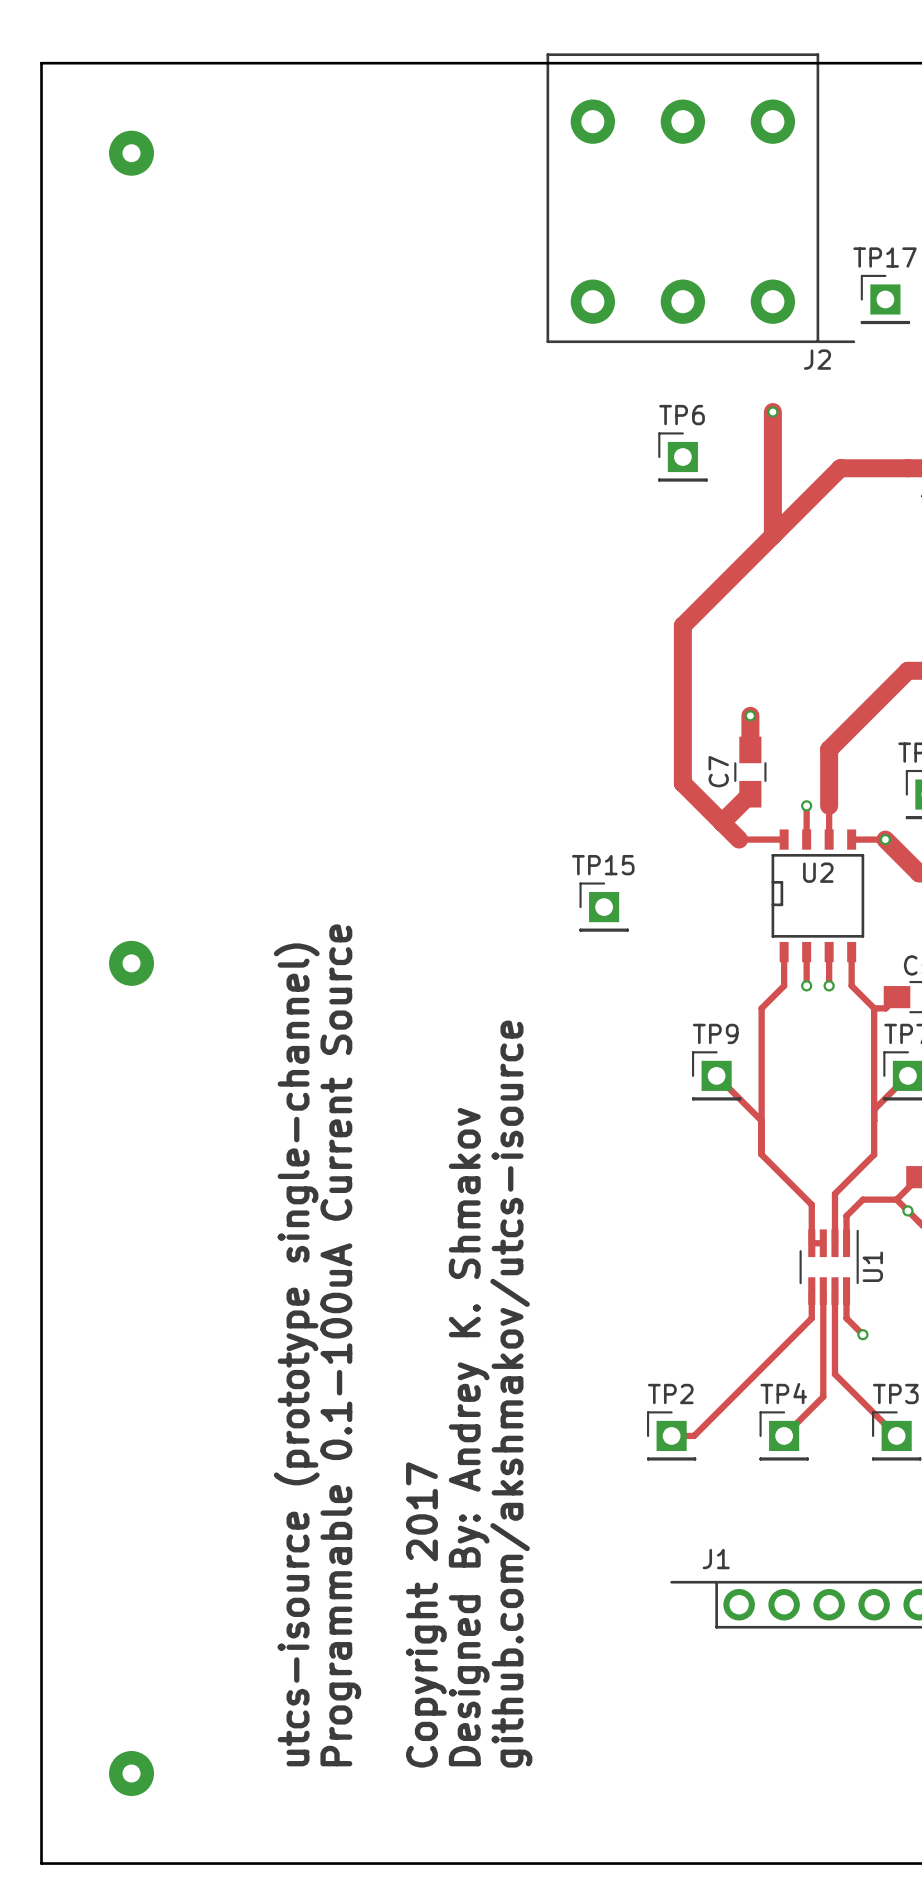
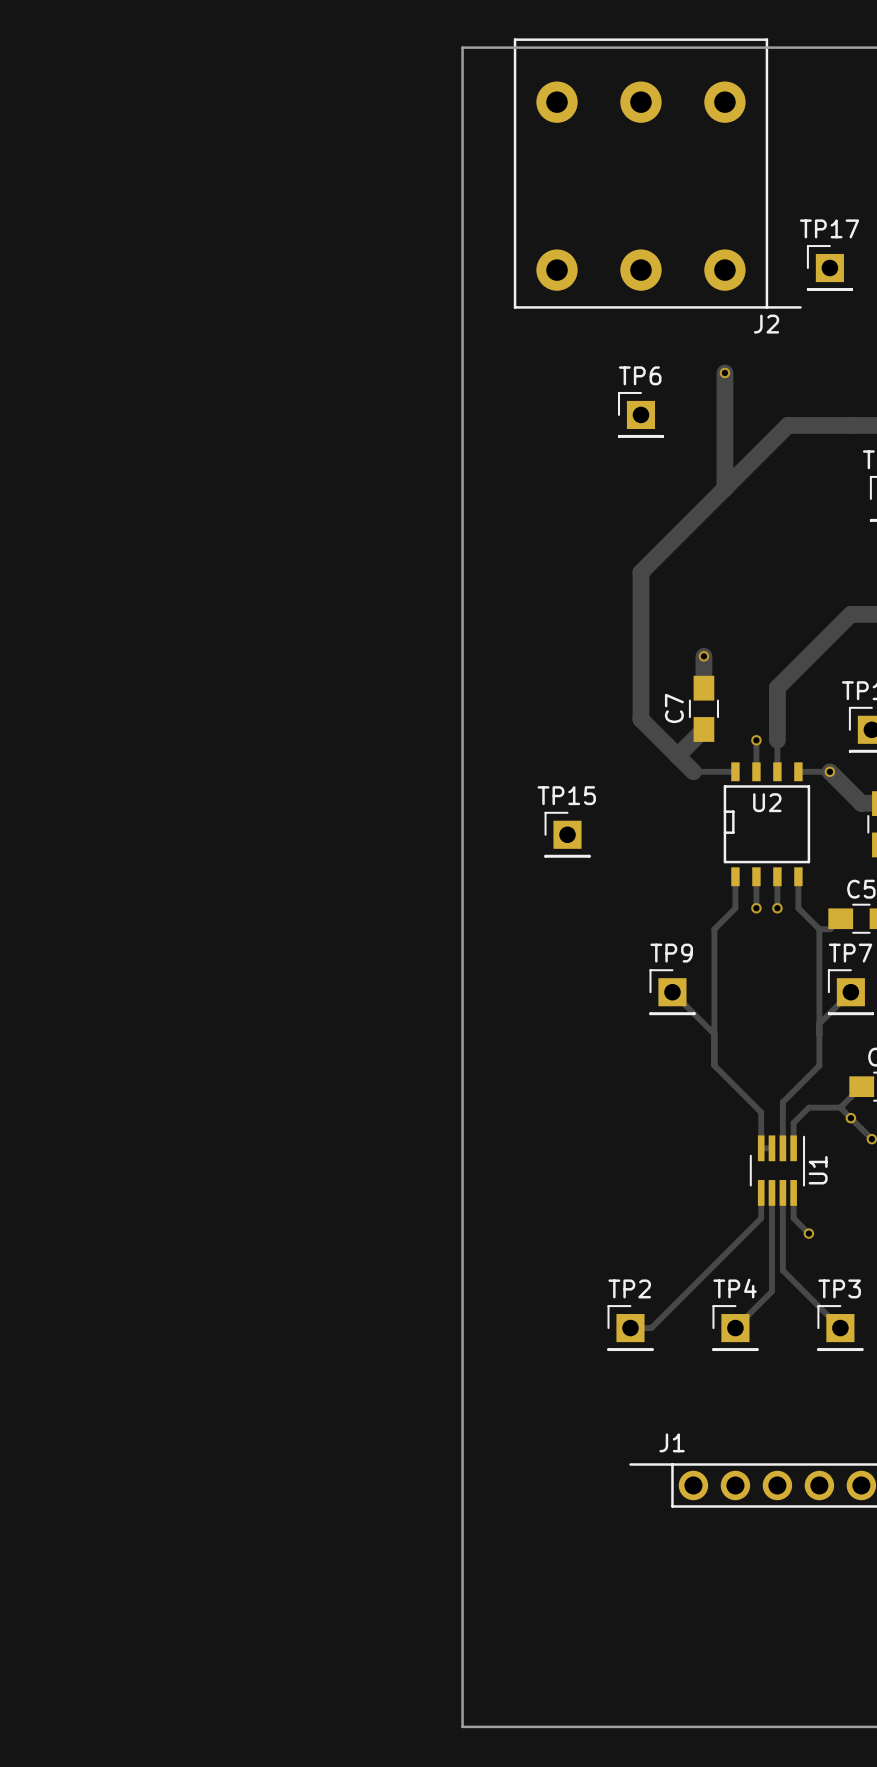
board edge: (491, 63) (41, 63) (41, 1863) (491, 1863) -> (462, 47) (462, 1726)
via: (131, 153) -> none
via: (131, 963) -> none
text: Programmable 0.1-100uA Current Source (340, 1345) -> none
text: utcs-isource (prototype single-channel) (296, 1354) -> none
text: github.com/akshmakov/utcs-isource (511, 1394) -> none
text: Designed By: Andrey K. Shmakov (469, 1437) -> none
text: Copyright 2017 (426, 1614) -> none
via: (131, 1773) -> none

